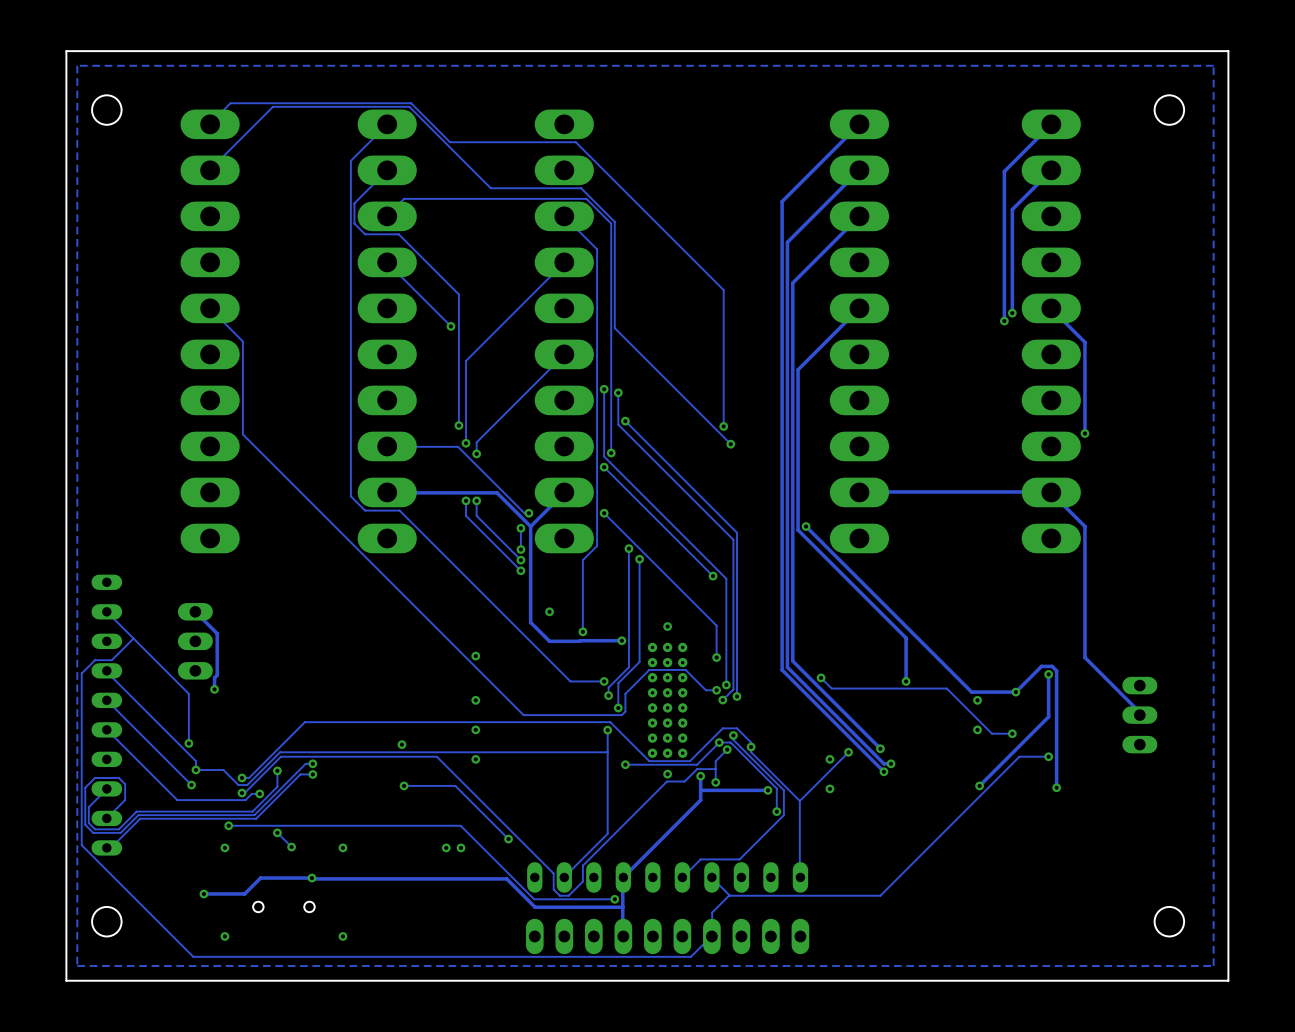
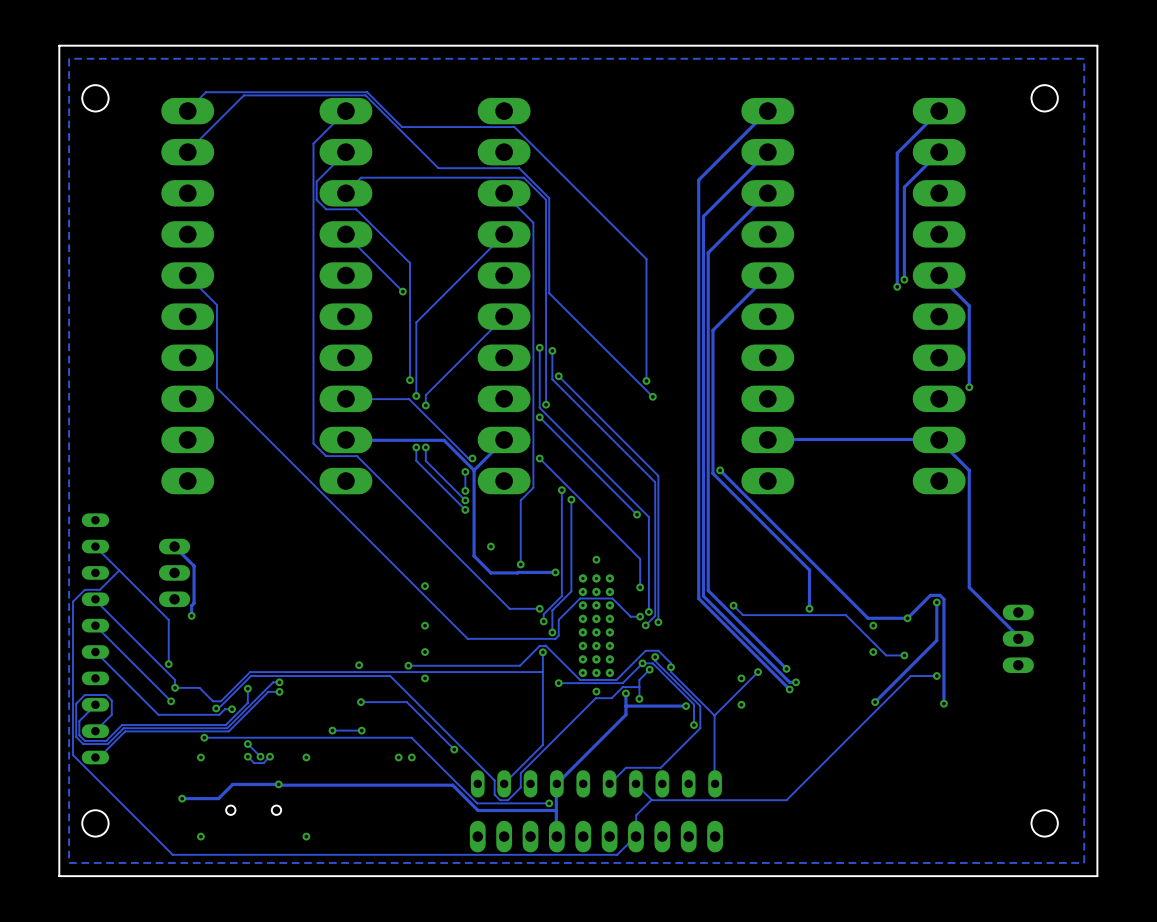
track: (610, 722) (304, 722) (249, 777) (242, 777) -> (545, 645) (539, 645) (519, 665) (408, 665)
via: none -> (408, 665)
via: (242, 777) -> none
via: none -> (332, 730)
track: none -> (361, 730) (332, 730)
via: none -> (361, 730)
via: none -> (247, 756)
track: none -> (269, 756) (263, 763) (254, 763) (247, 756)
via: none -> (269, 756)

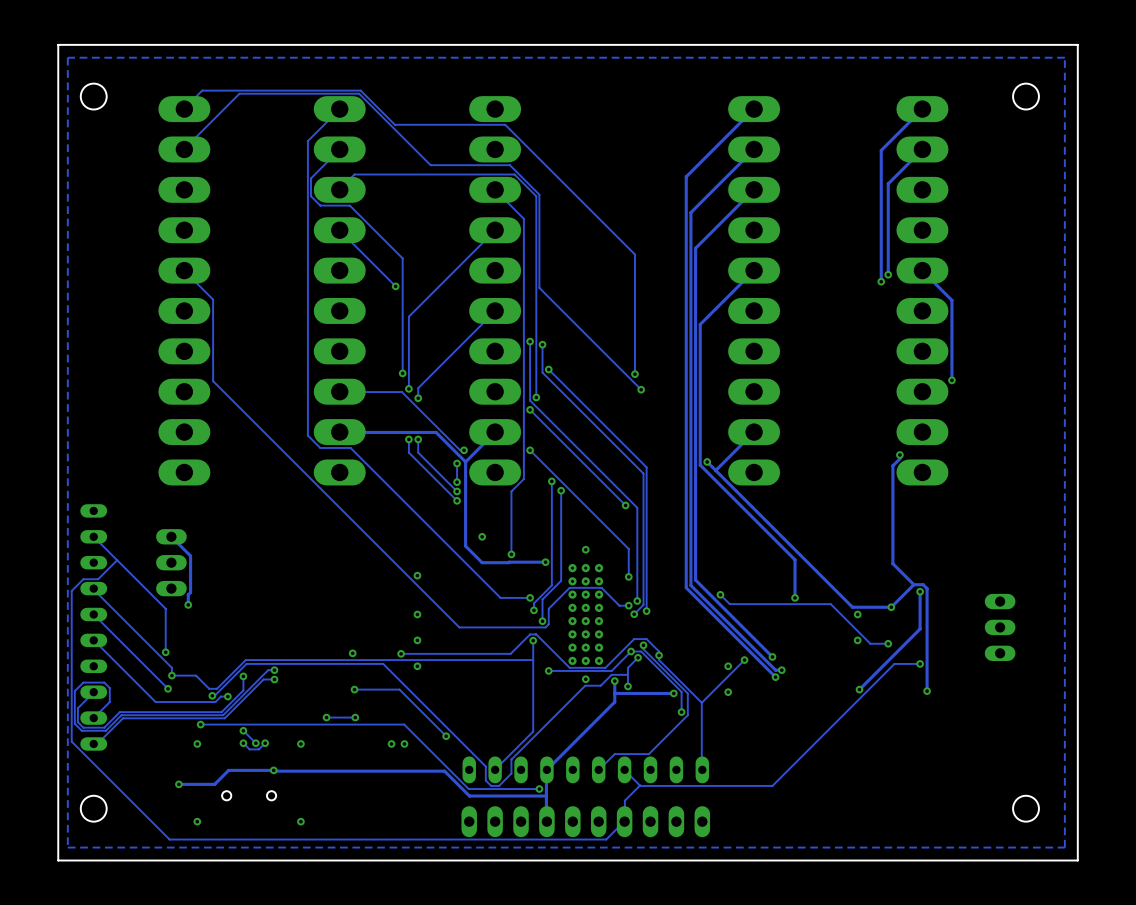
track: (767, 439) (939, 439) (969, 470) (969, 587) (1018, 636) (1018, 638) -> (754, 432) (715, 470)
track: none -> (899, 454) (899, 458) (892, 465) (892, 563) (913, 584)
via: none -> (899, 454)

